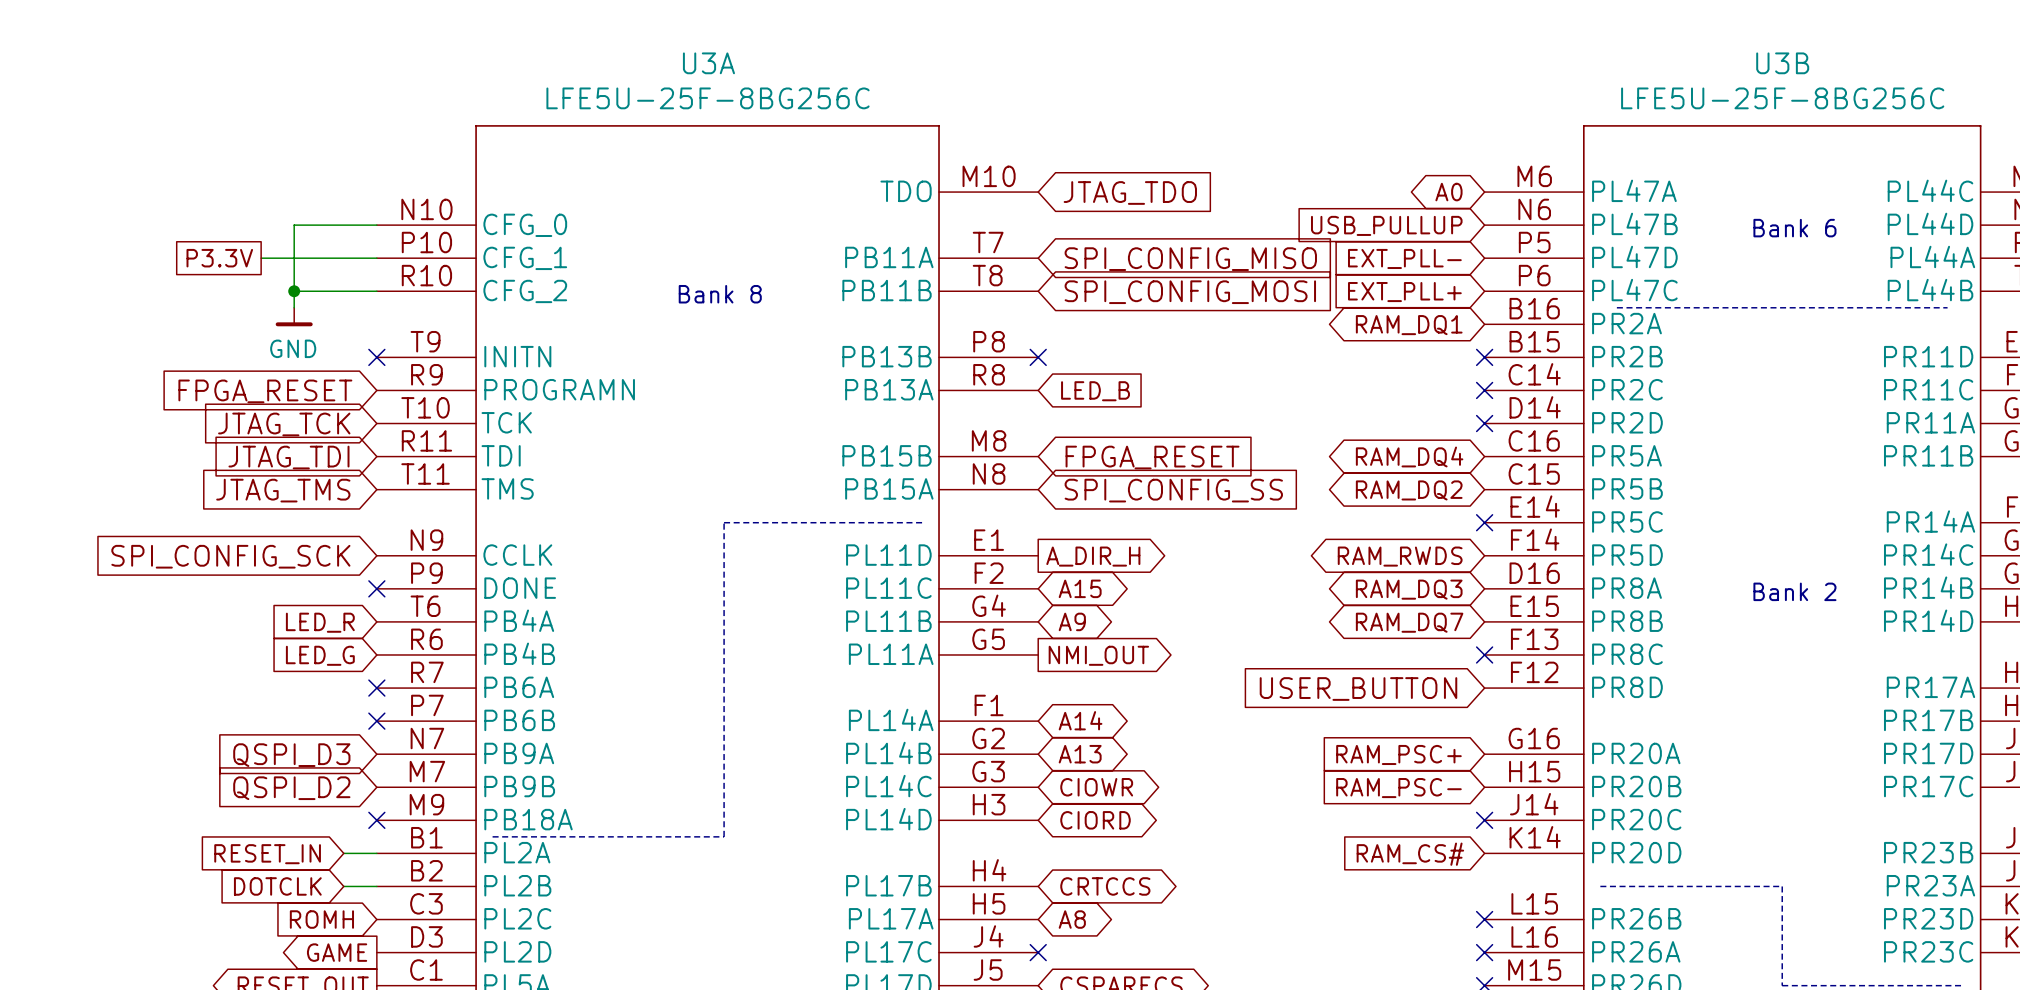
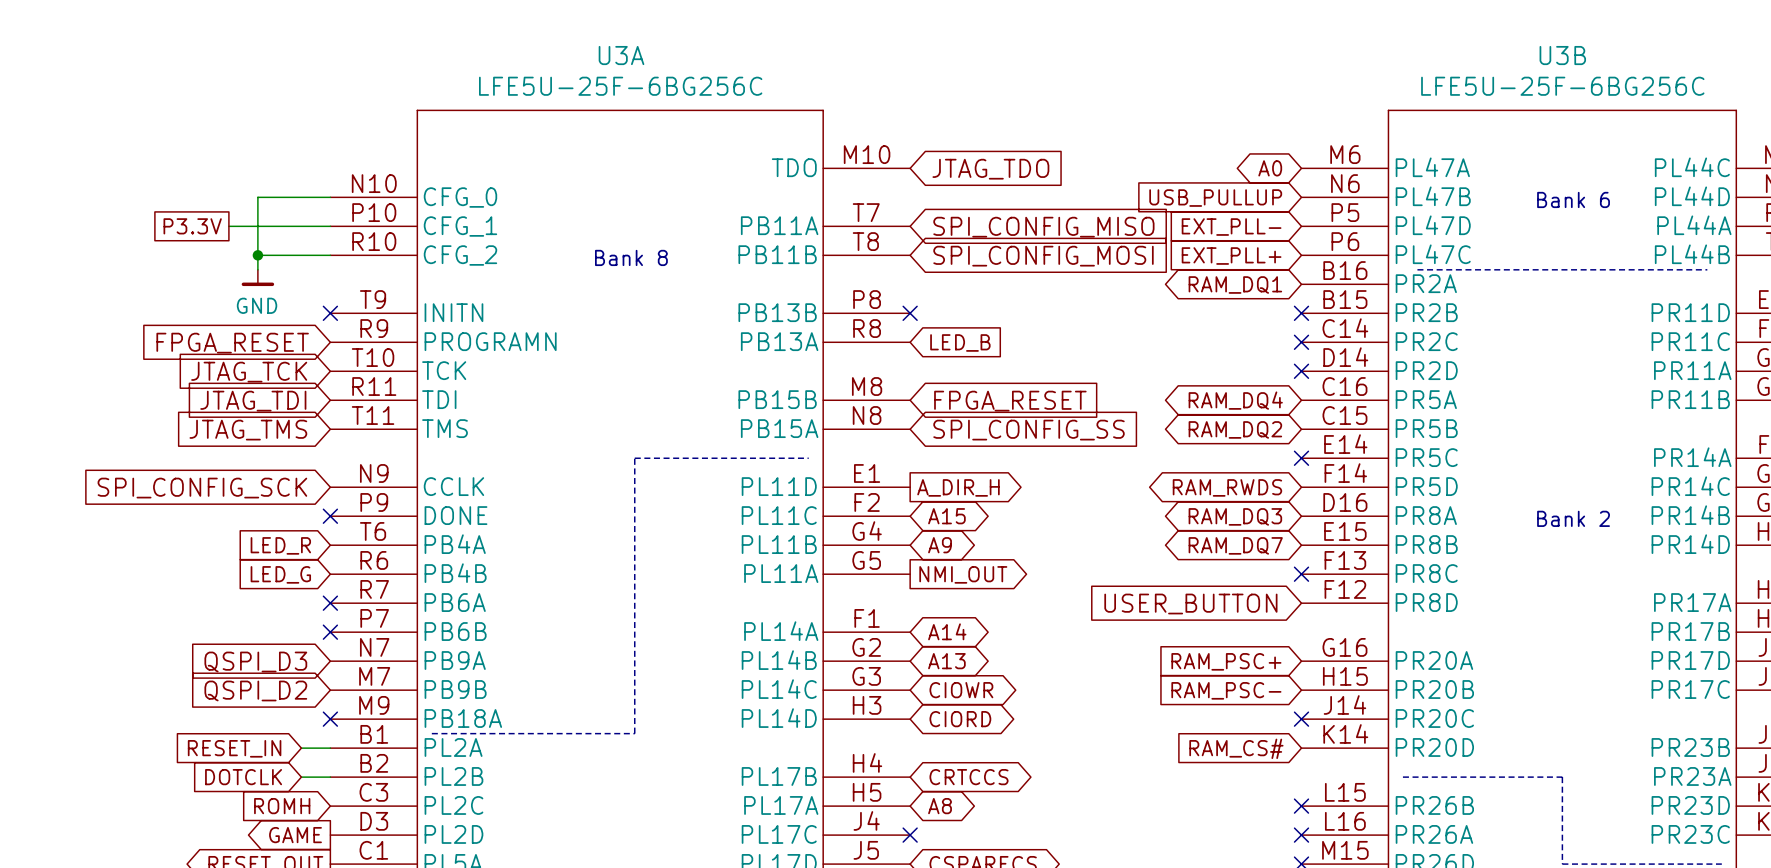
U3A value: LFE5U-25F-8BG256C (708, 98) -> LFE5U-25F-6BG256C (620, 86)
U3B value: LFE5U-25F-8BG256C (1782, 98) -> LFE5U-25F-6BG256C (1562, 86)

